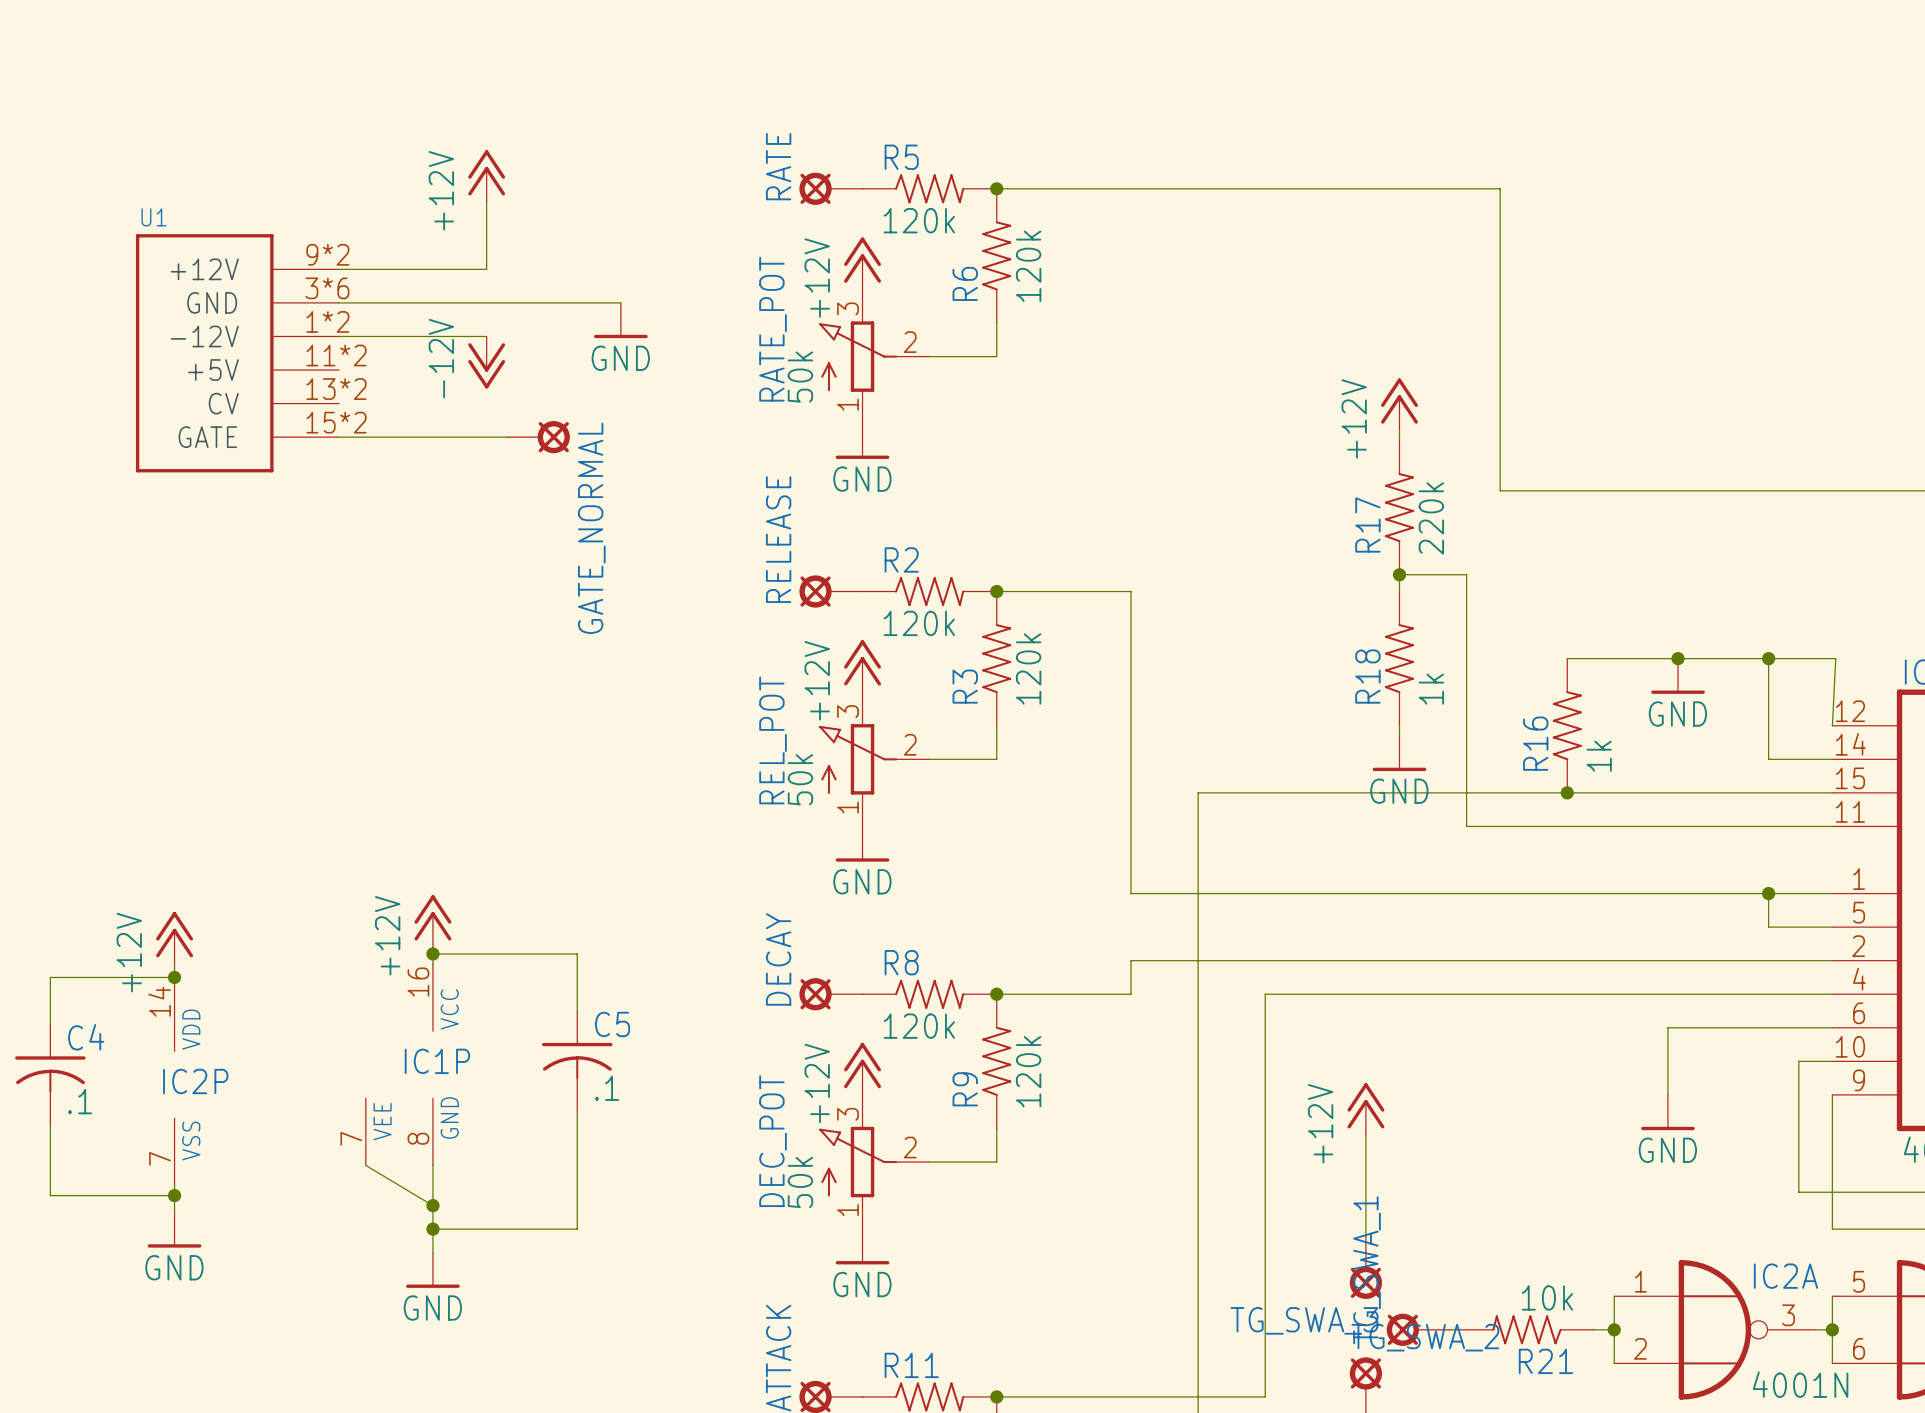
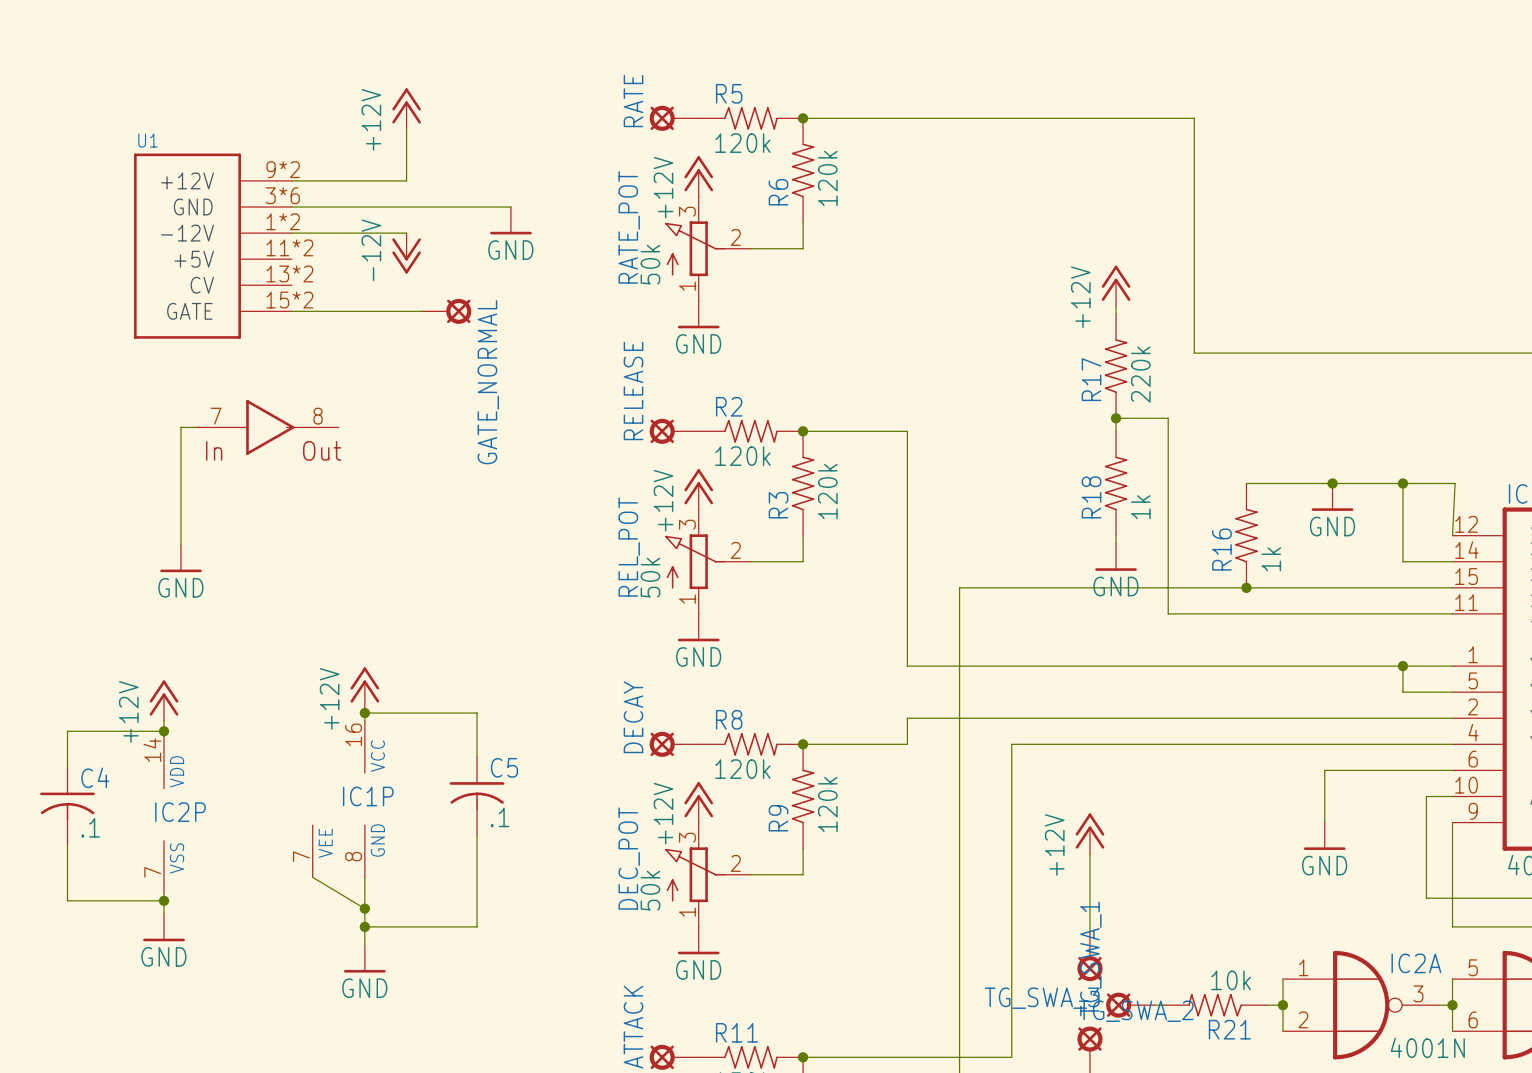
wire: none -> (195, 427) (180, 427) (180, 544)
part: none -> (267, 427)
power symbol: none -> GND (180, 558)

